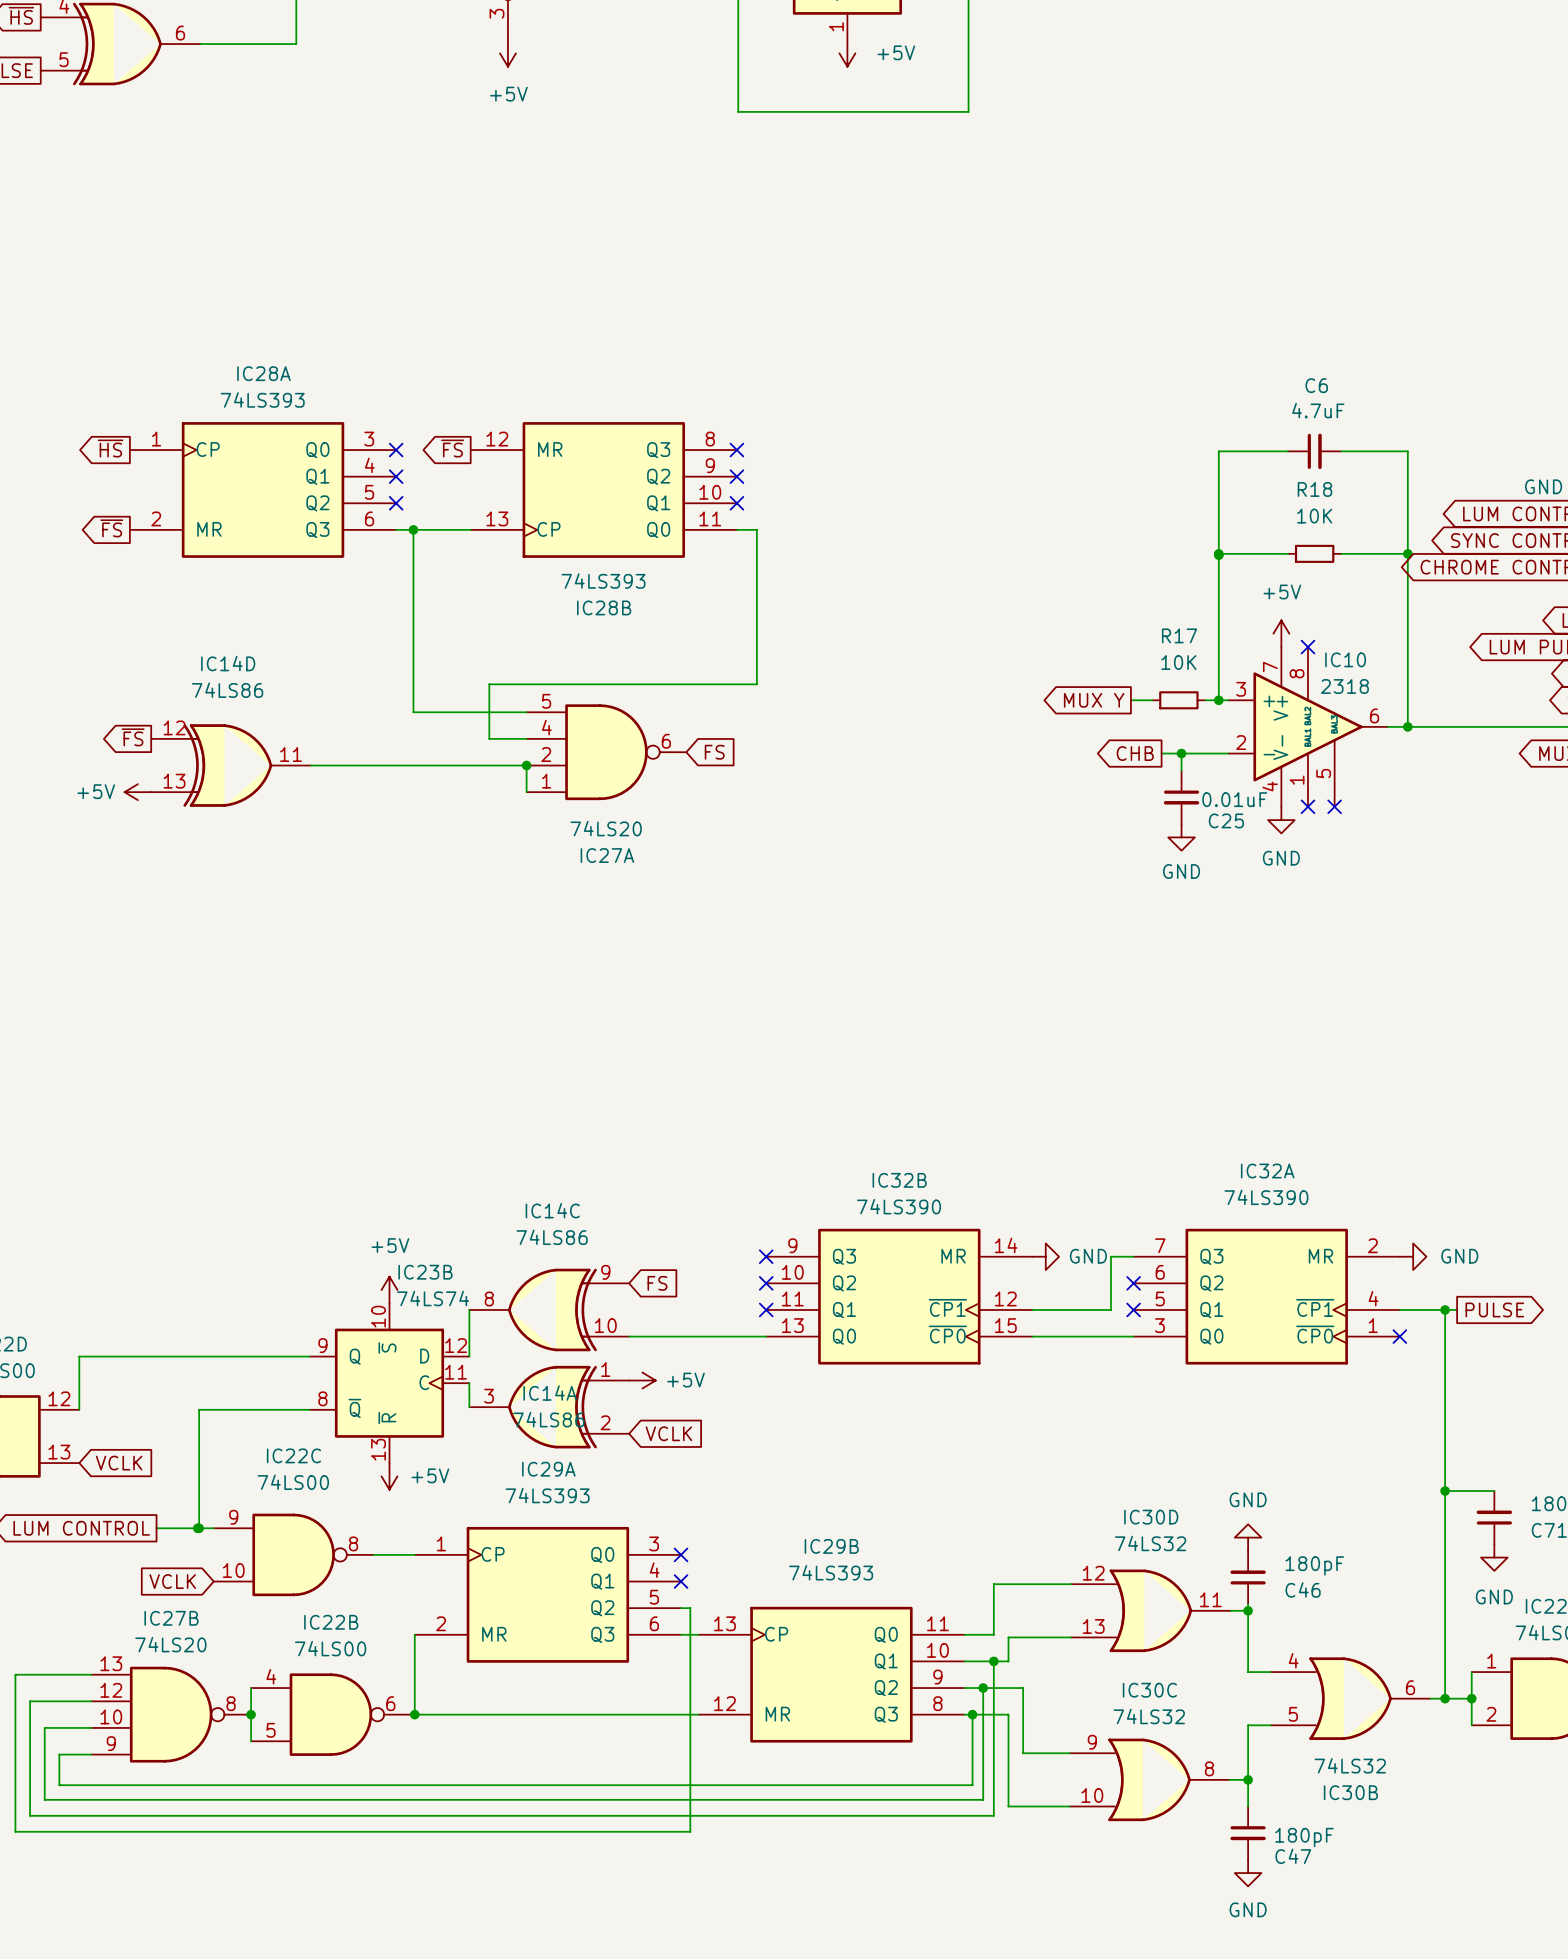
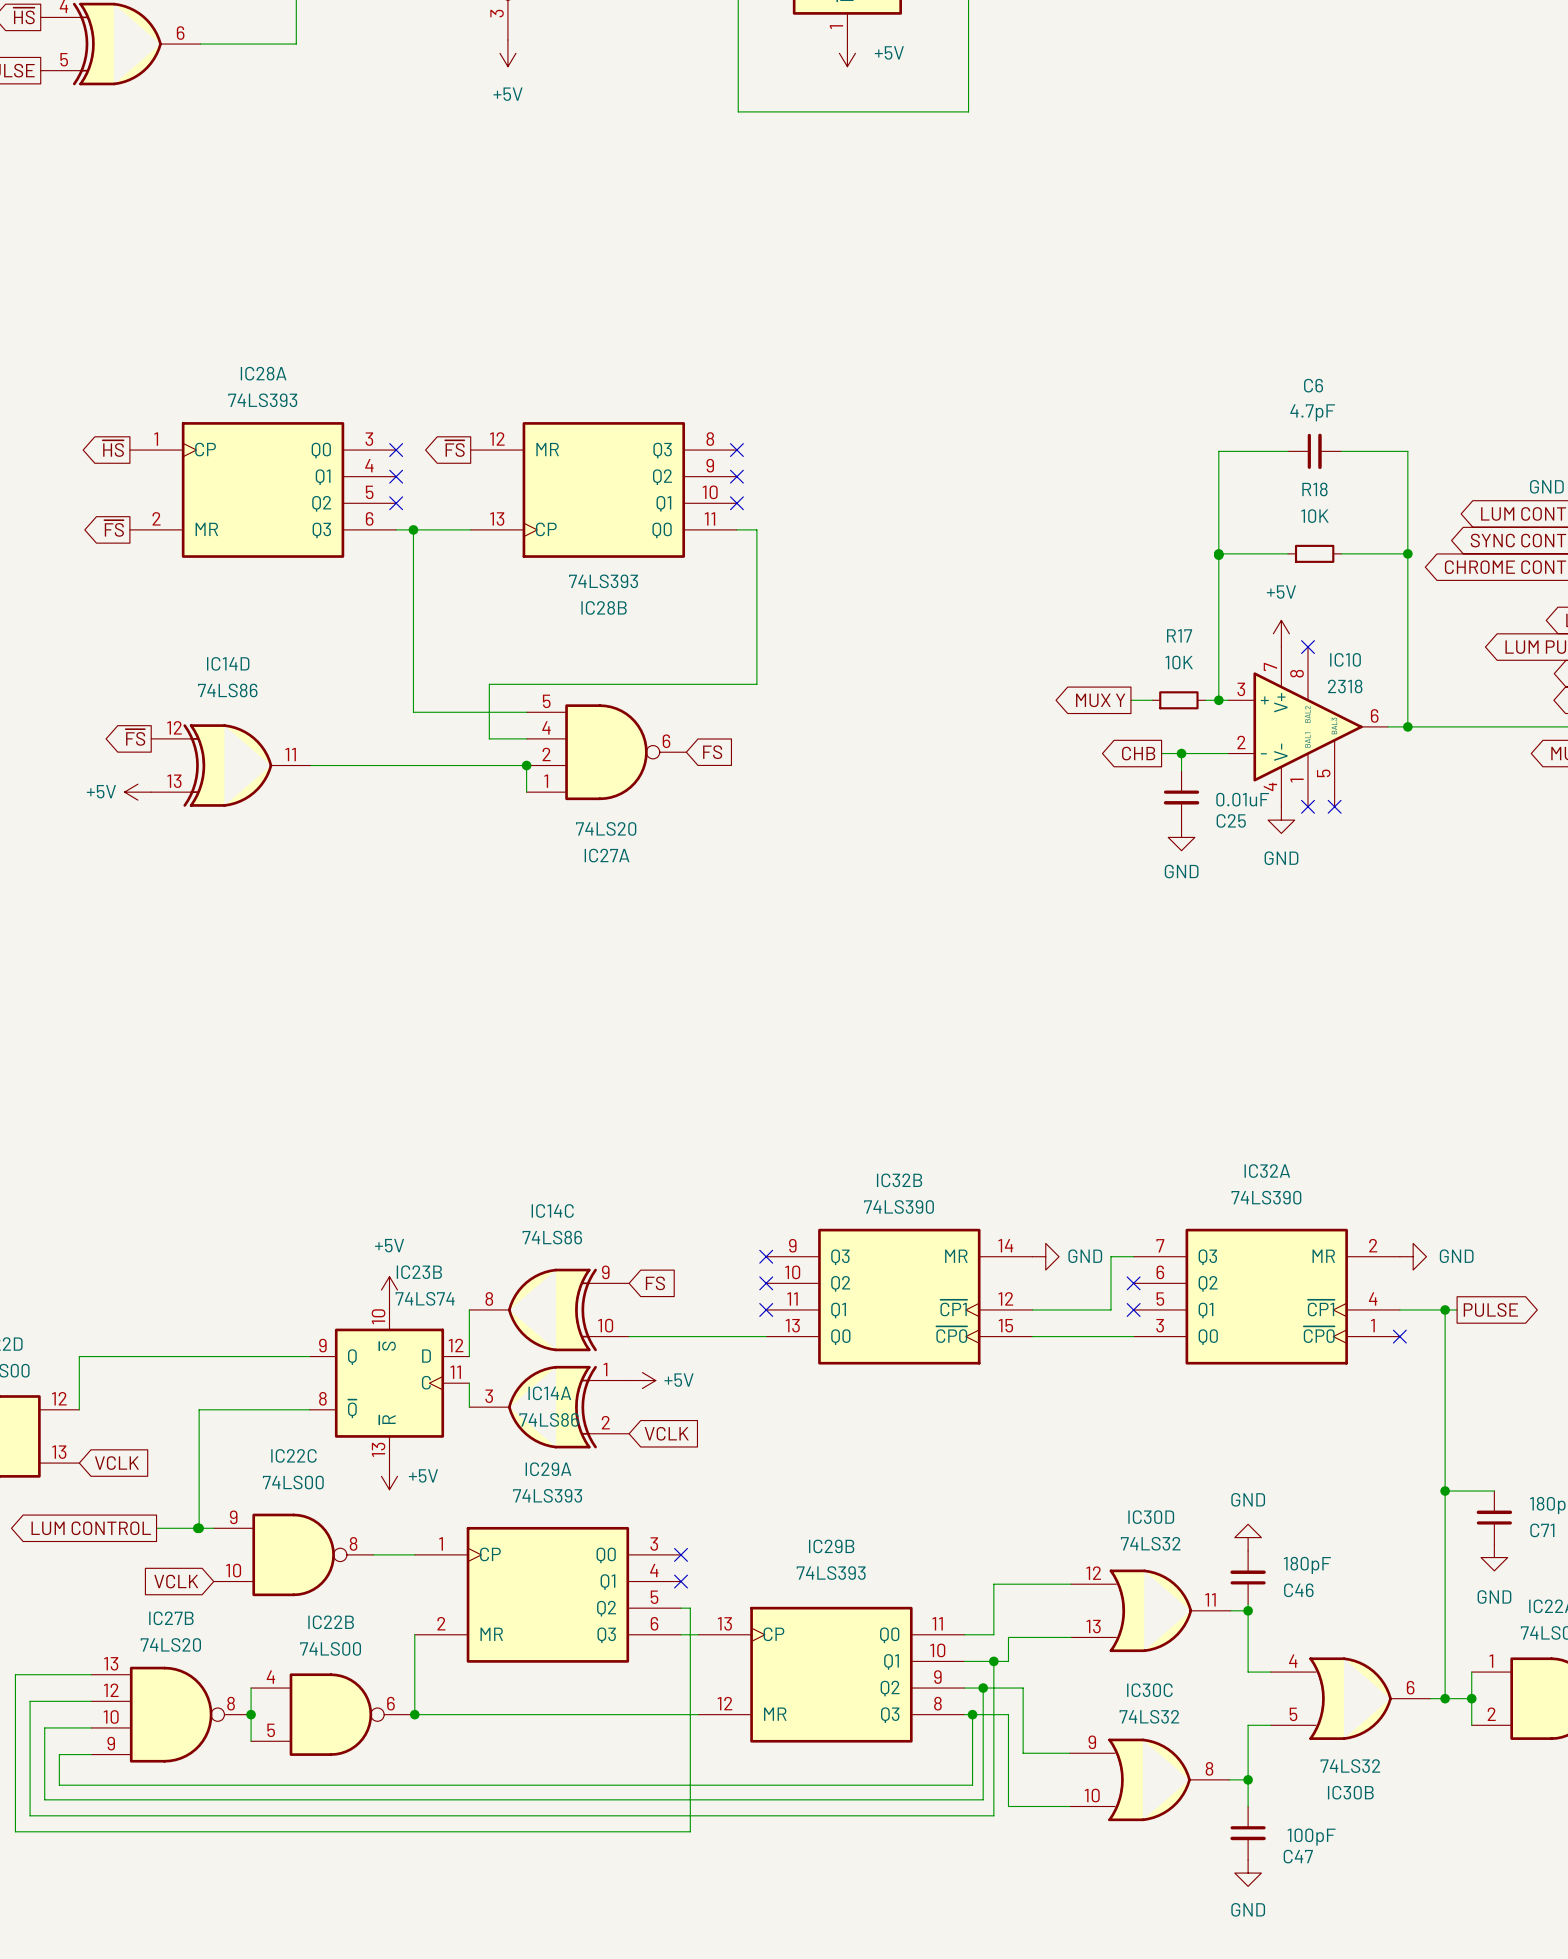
C6 value: 4.7uF (1318, 410) -> 4.7pF (1312, 412)
C47 value: 180pF (1304, 1837) -> 100pF (1311, 1837)

